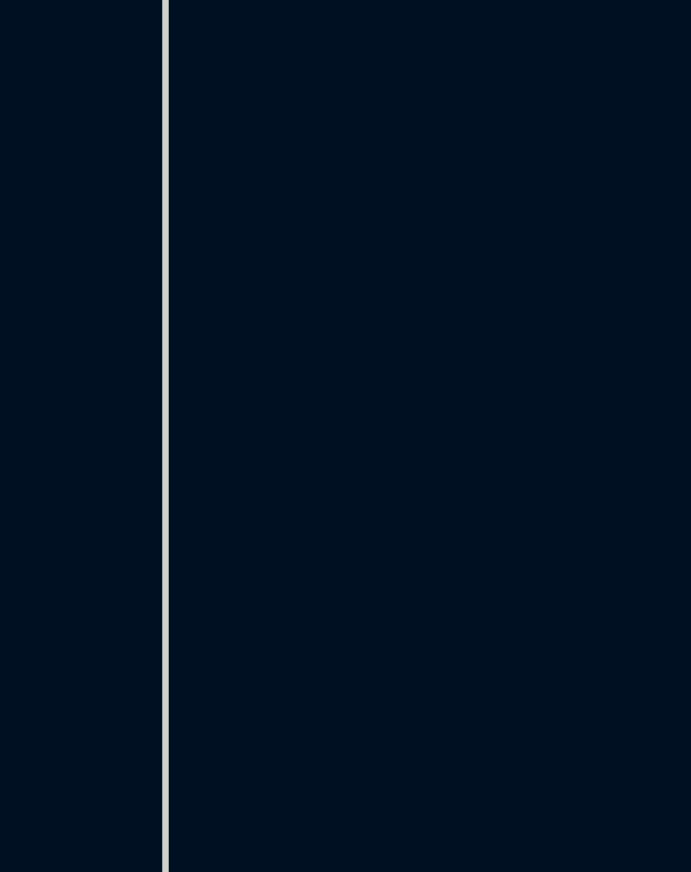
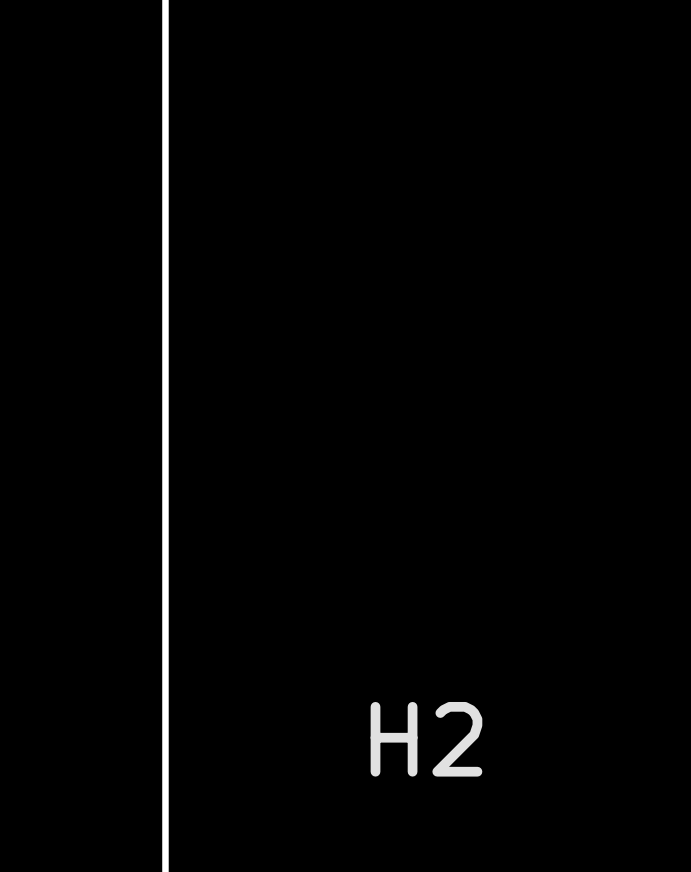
H2 name: none -> H2 (426, 739)

